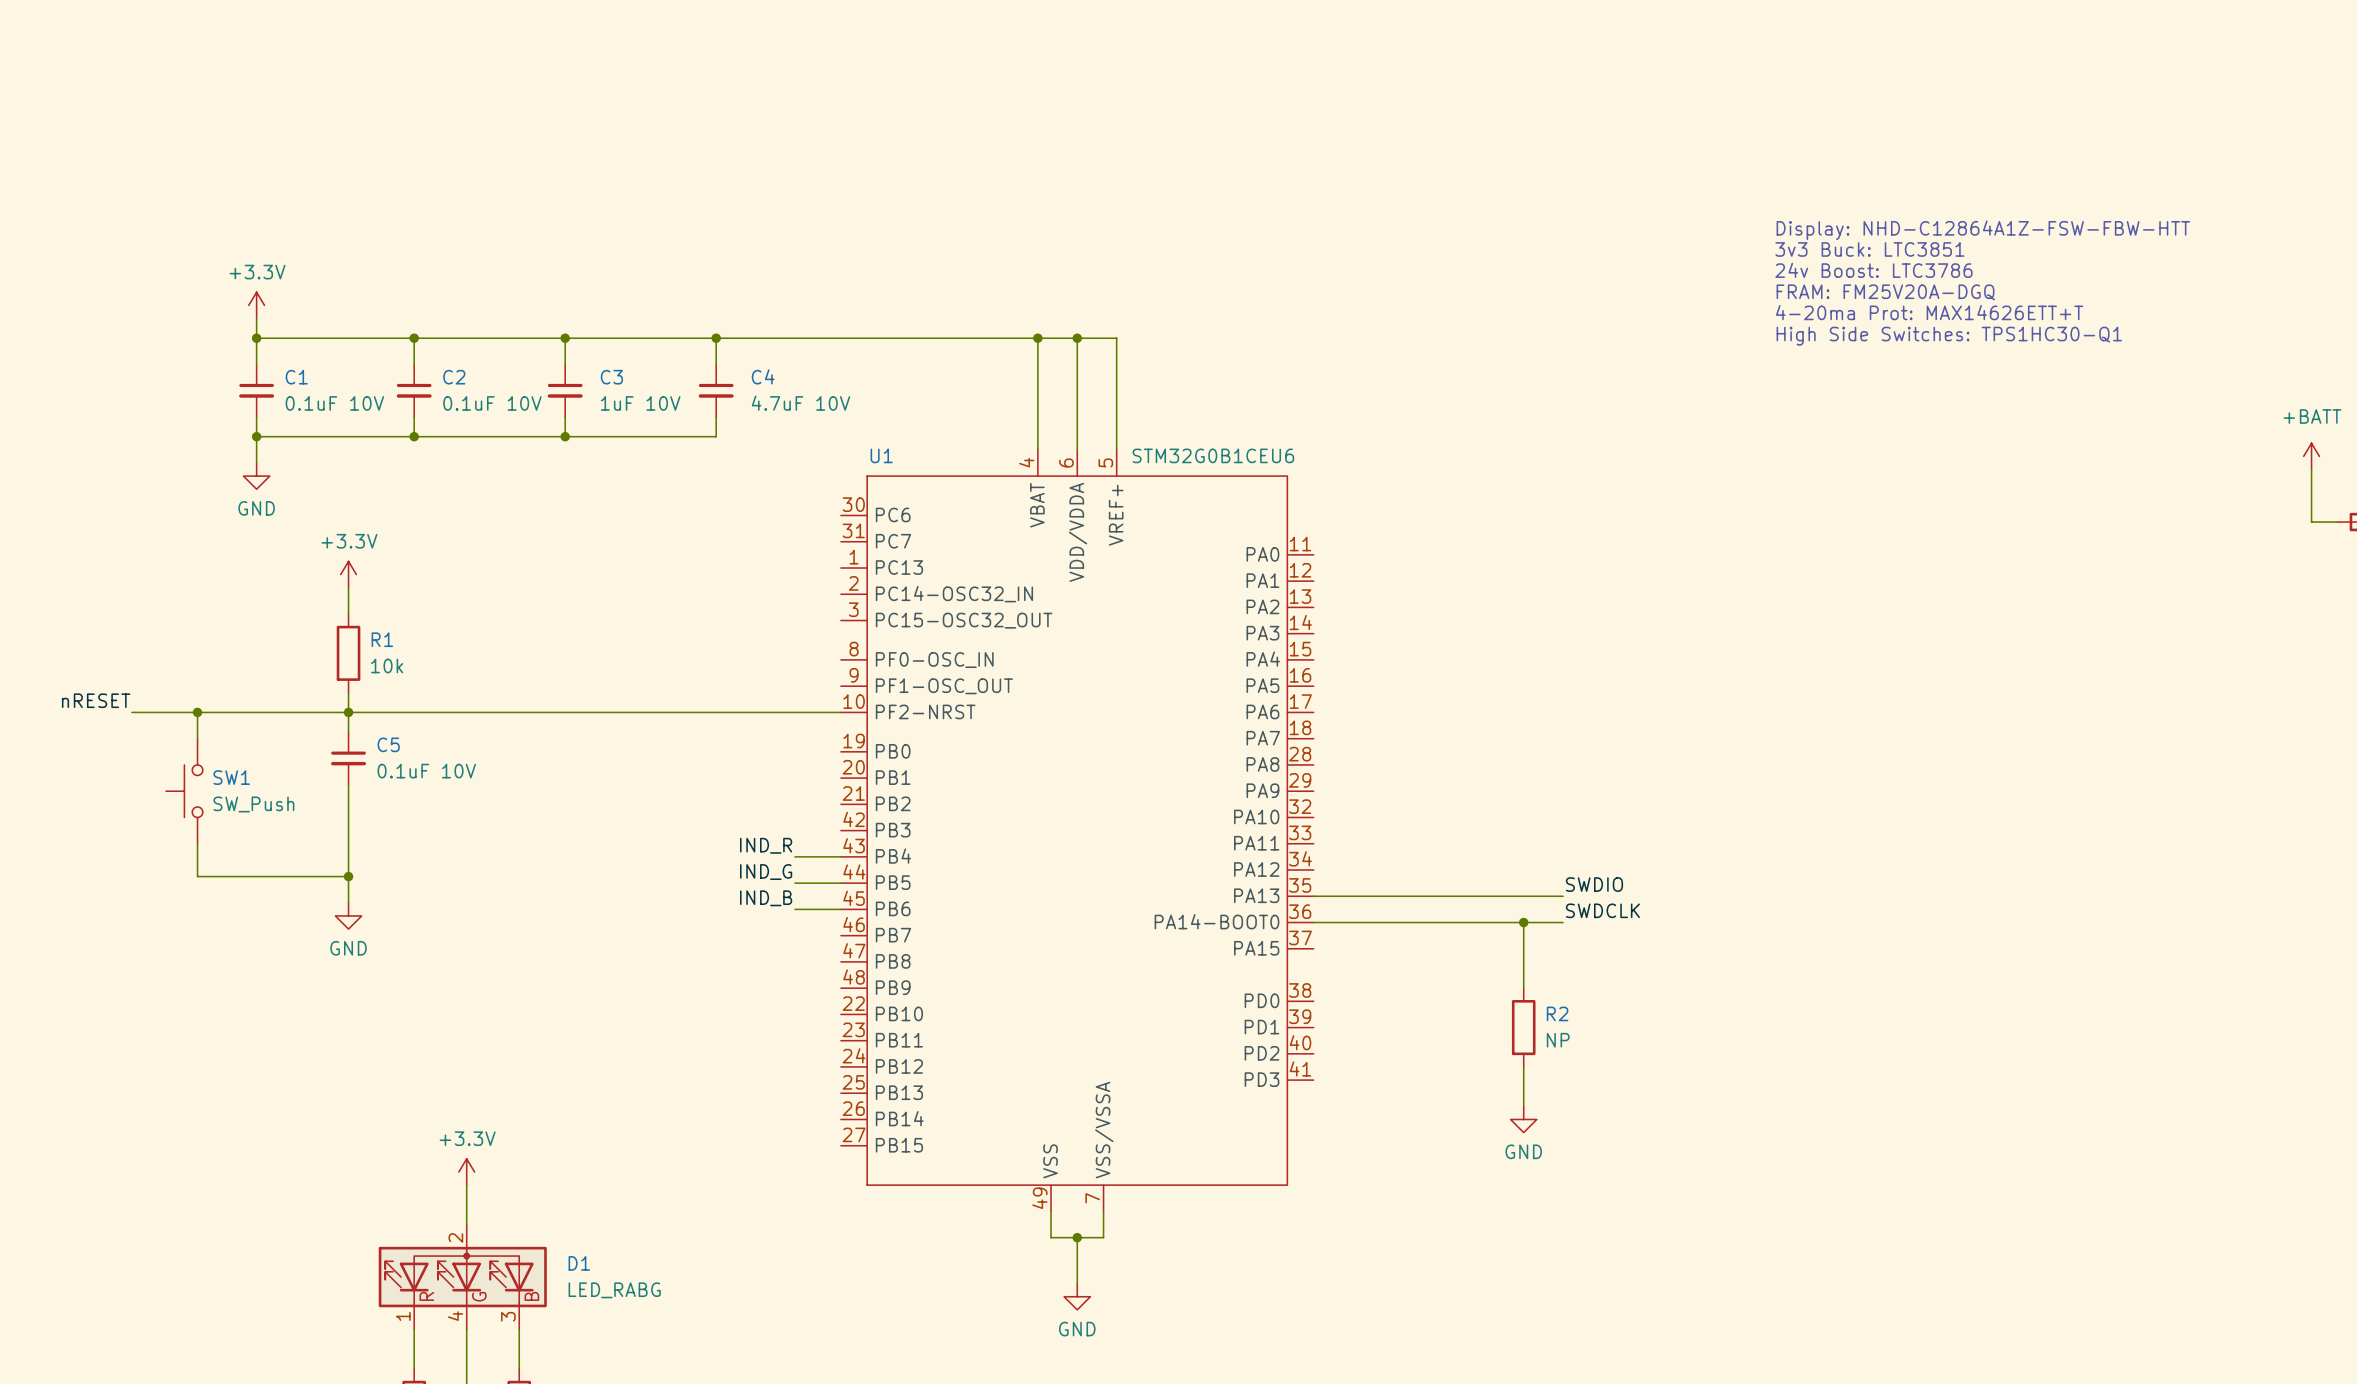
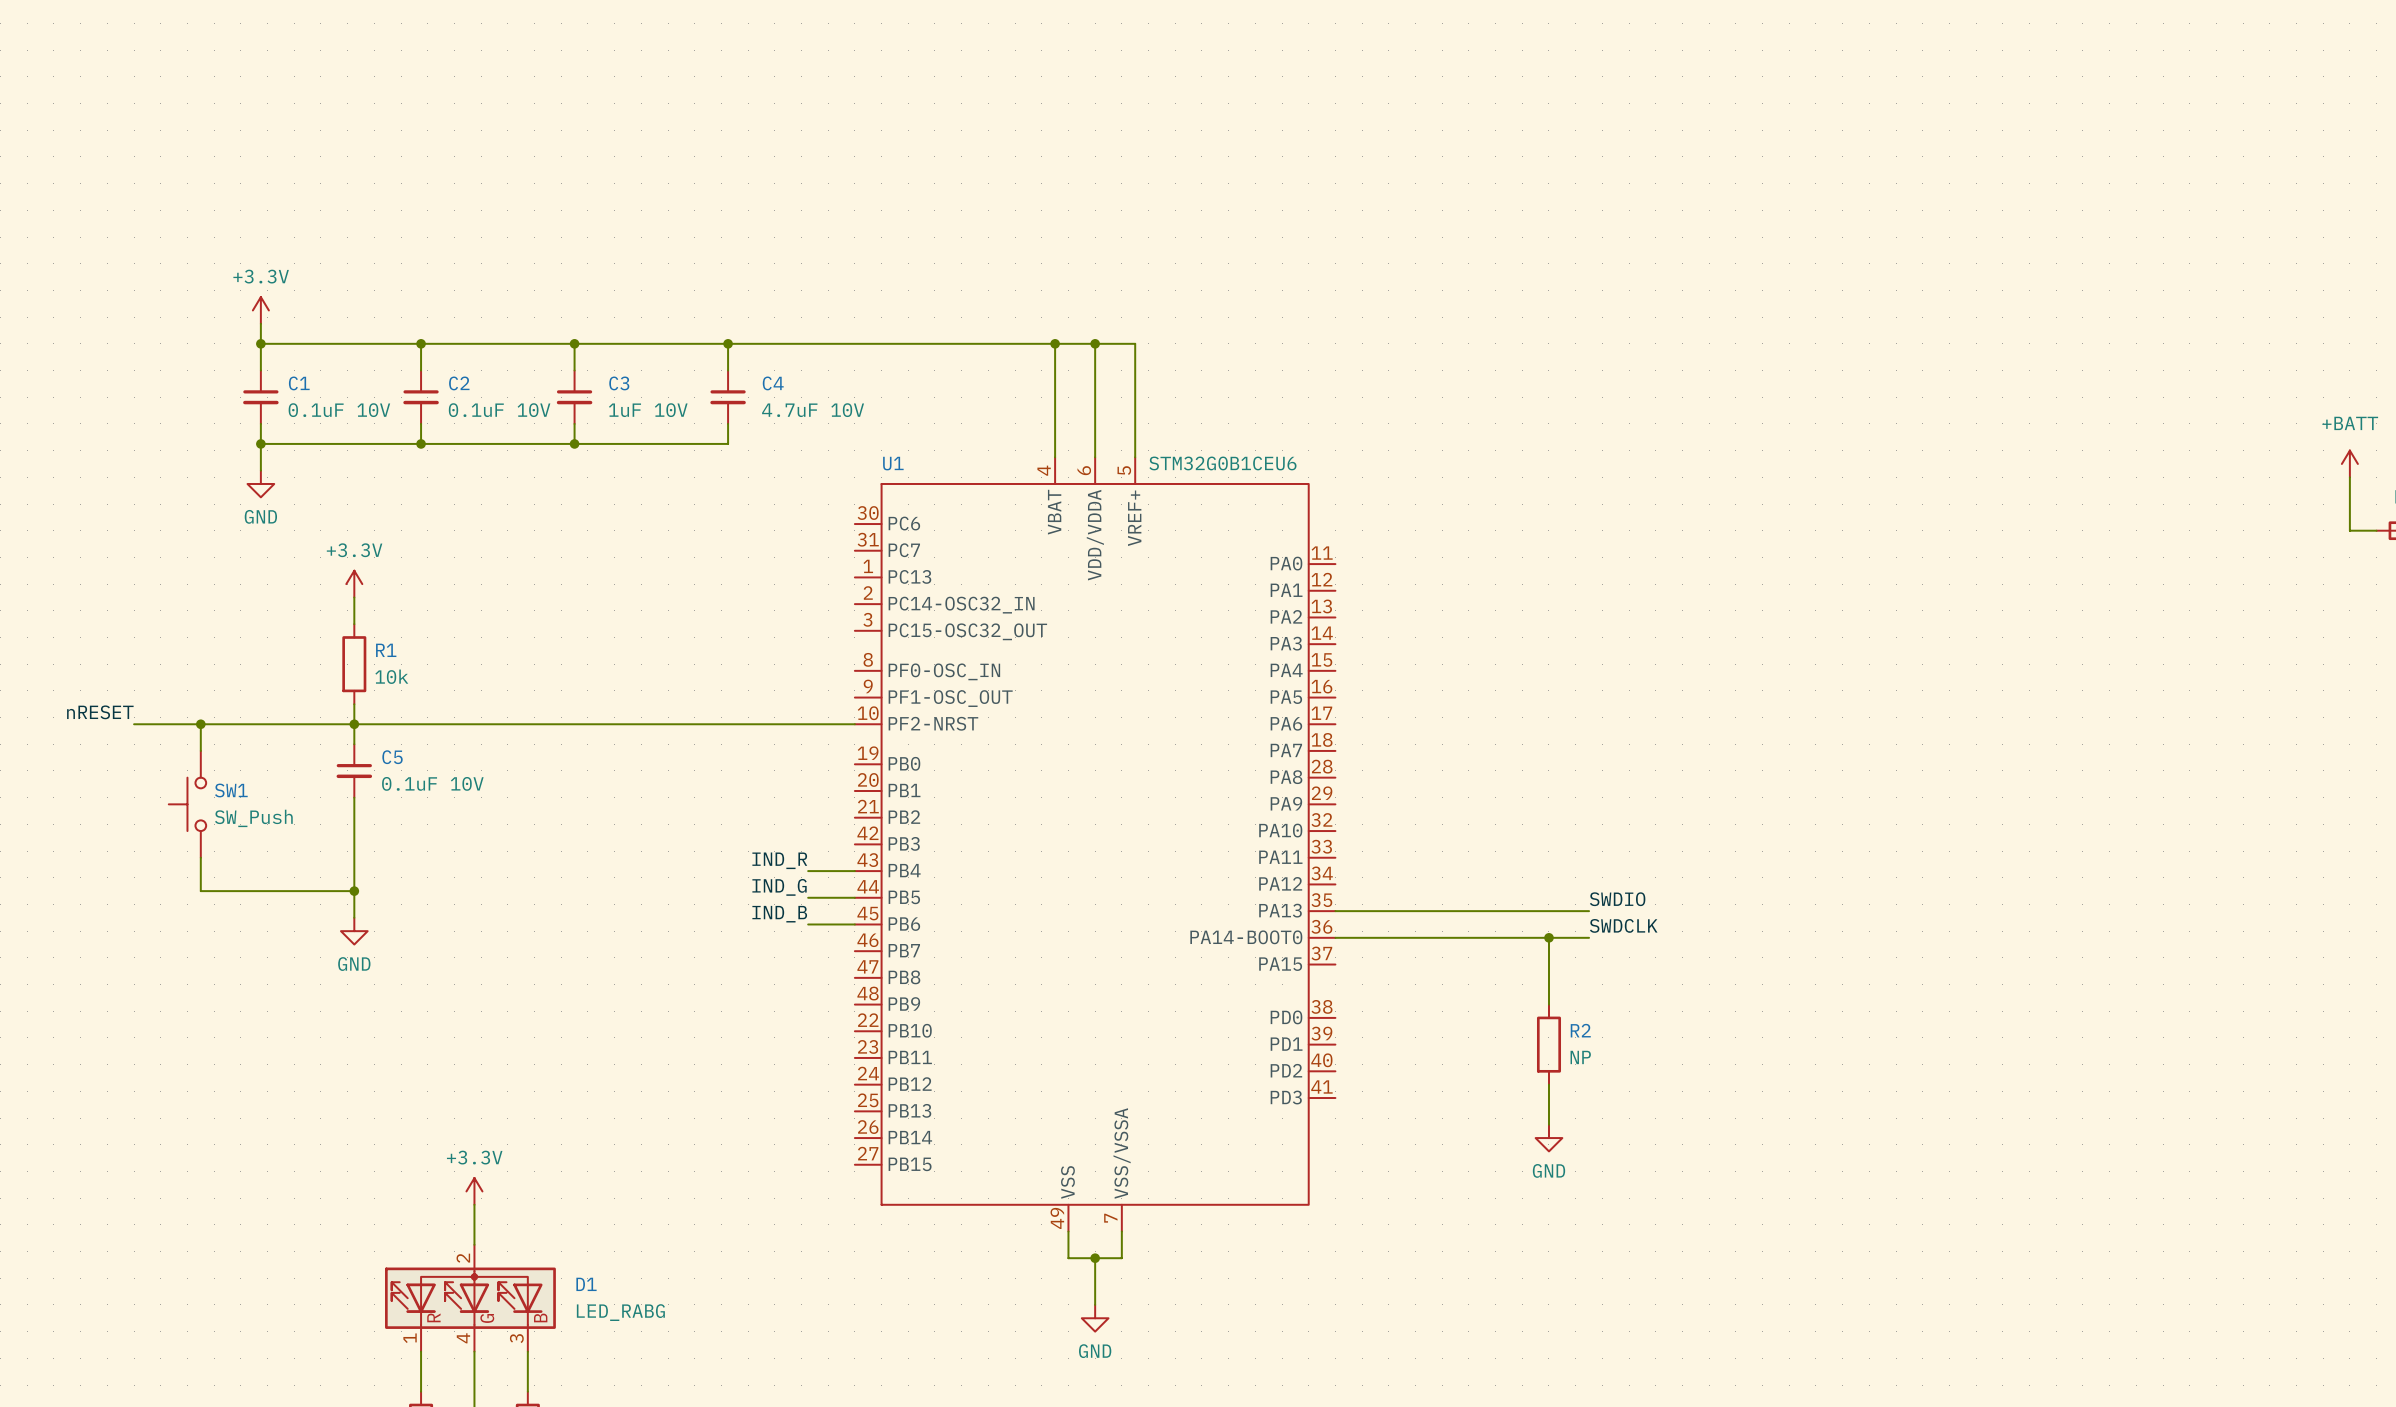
text: Display: NHD-C12864A1Z-FSW-FBW-HTT (1983, 230) -> none
text: 3v3 Buck: LTC3851 (1869, 249) -> none
text: 24v Boost: LTC3786 (1873, 270) -> none
text: FRAM: FM25V20A-DGQ (1885, 292) -> none
text: 4-20ma Prot: MAX14626ETT+T (1929, 312) -> none
text: High Side Switches: TPS1HC30-Q1 (1949, 336) -> none

